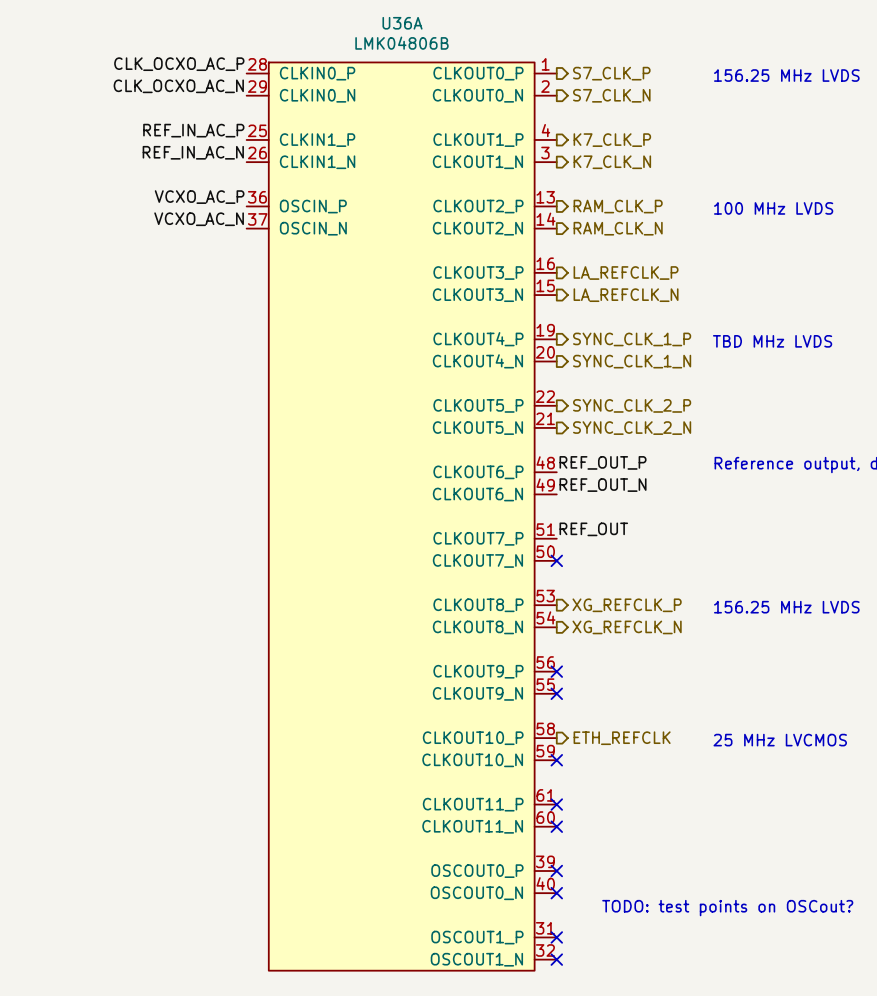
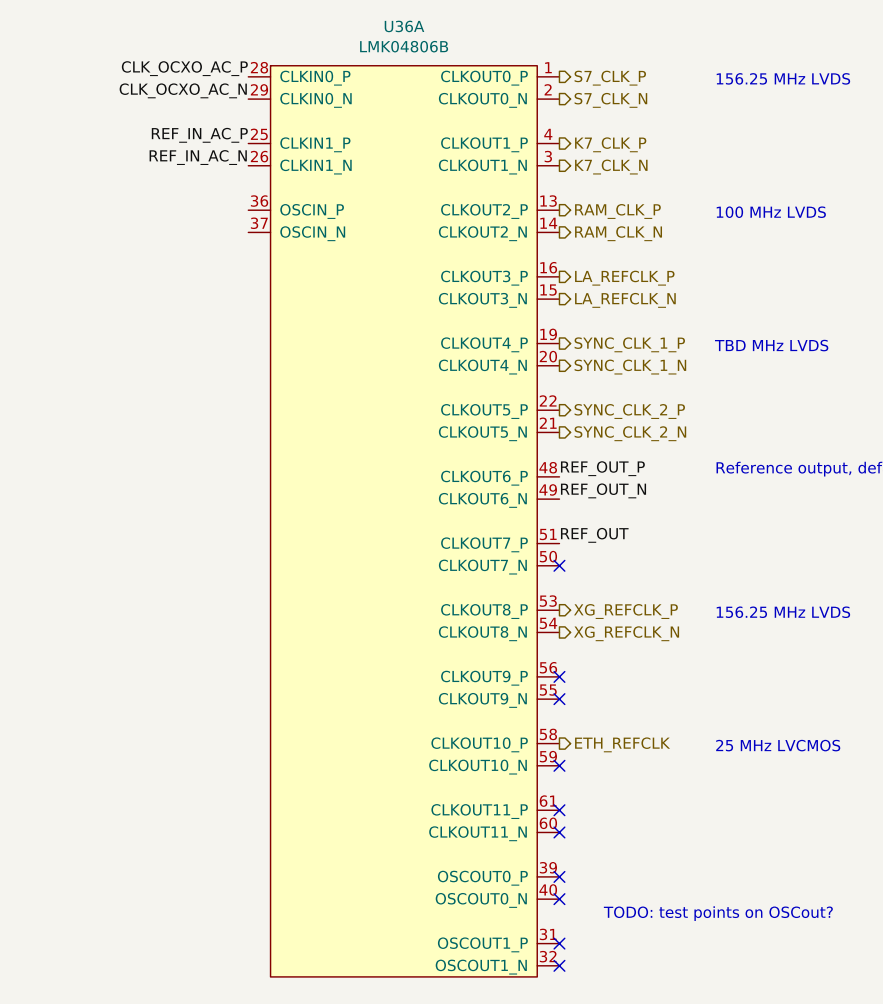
label: VCXO_AC_P (199, 197) -> none
label: VCXO_AC_N (199, 219) -> none

